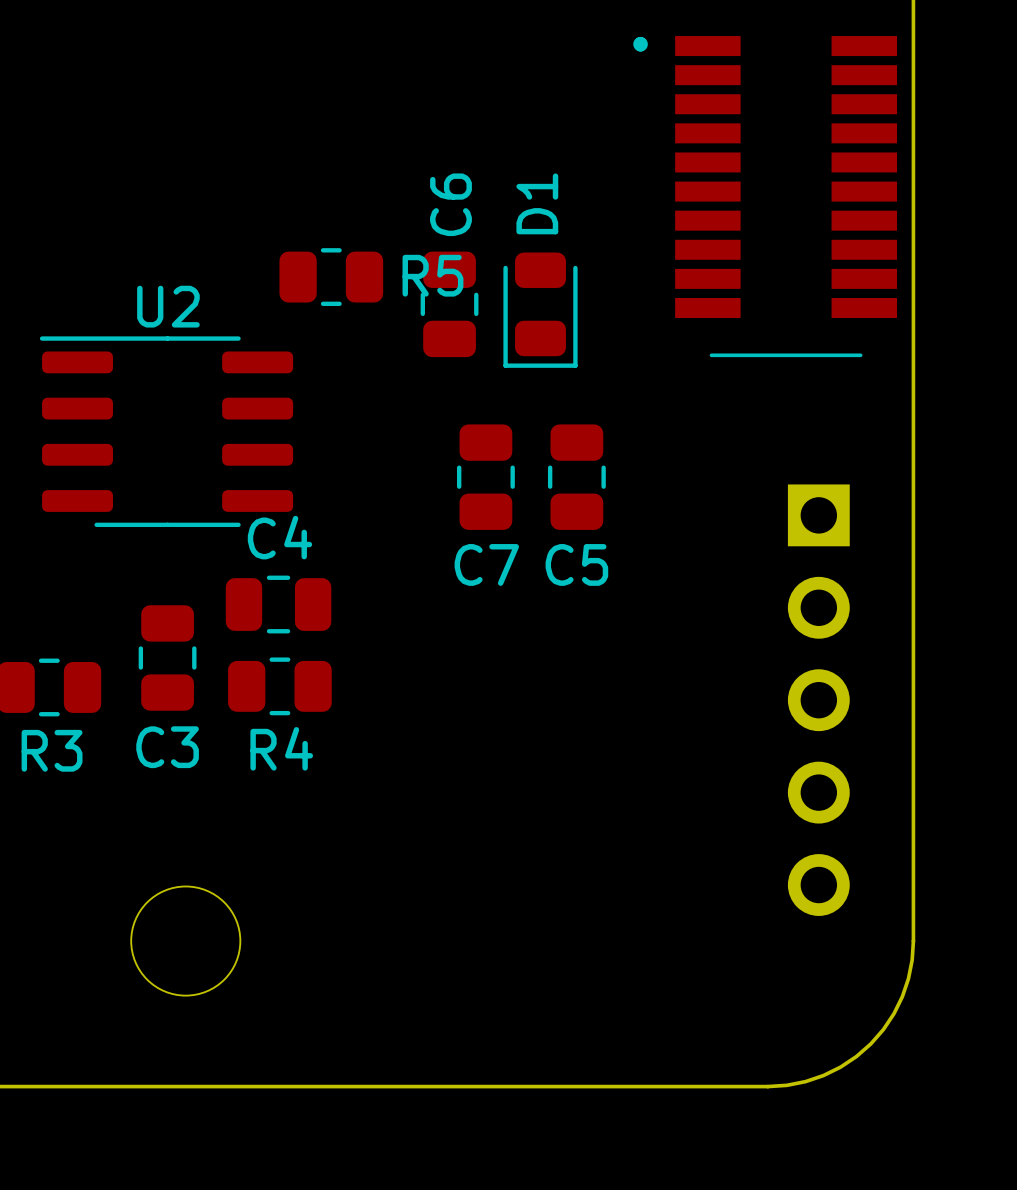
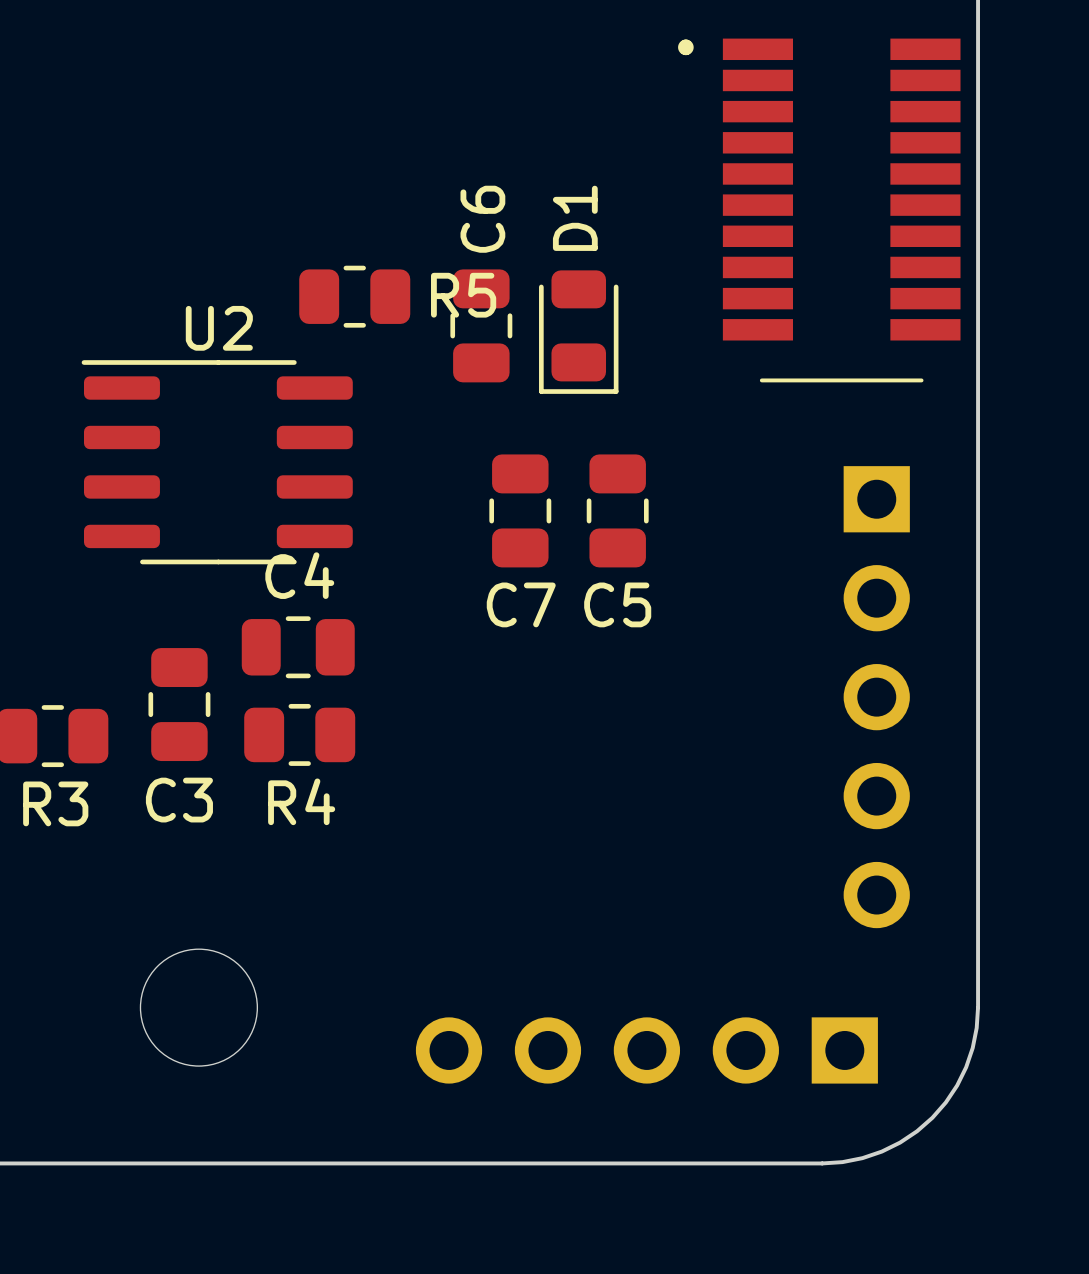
U2 position: (166, 431) -> (217, 462)
part position: (818, 700) -> (876, 697)
part: none -> (646, 1050)

